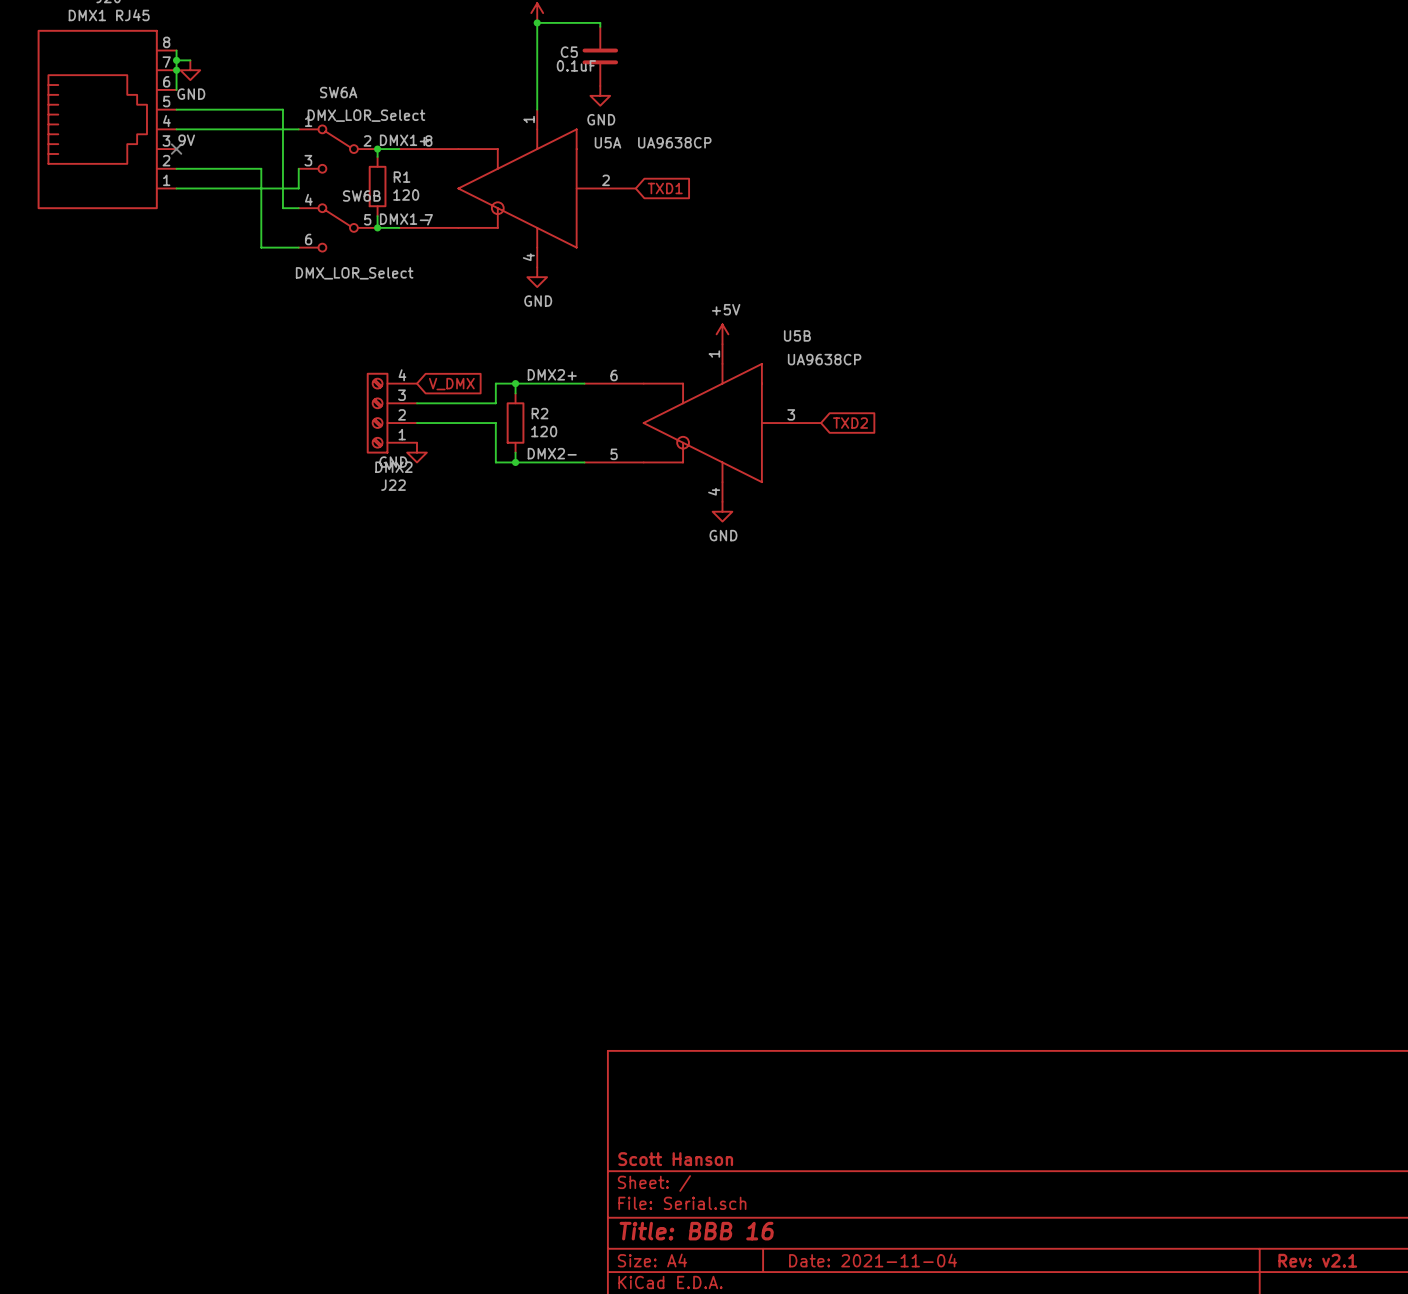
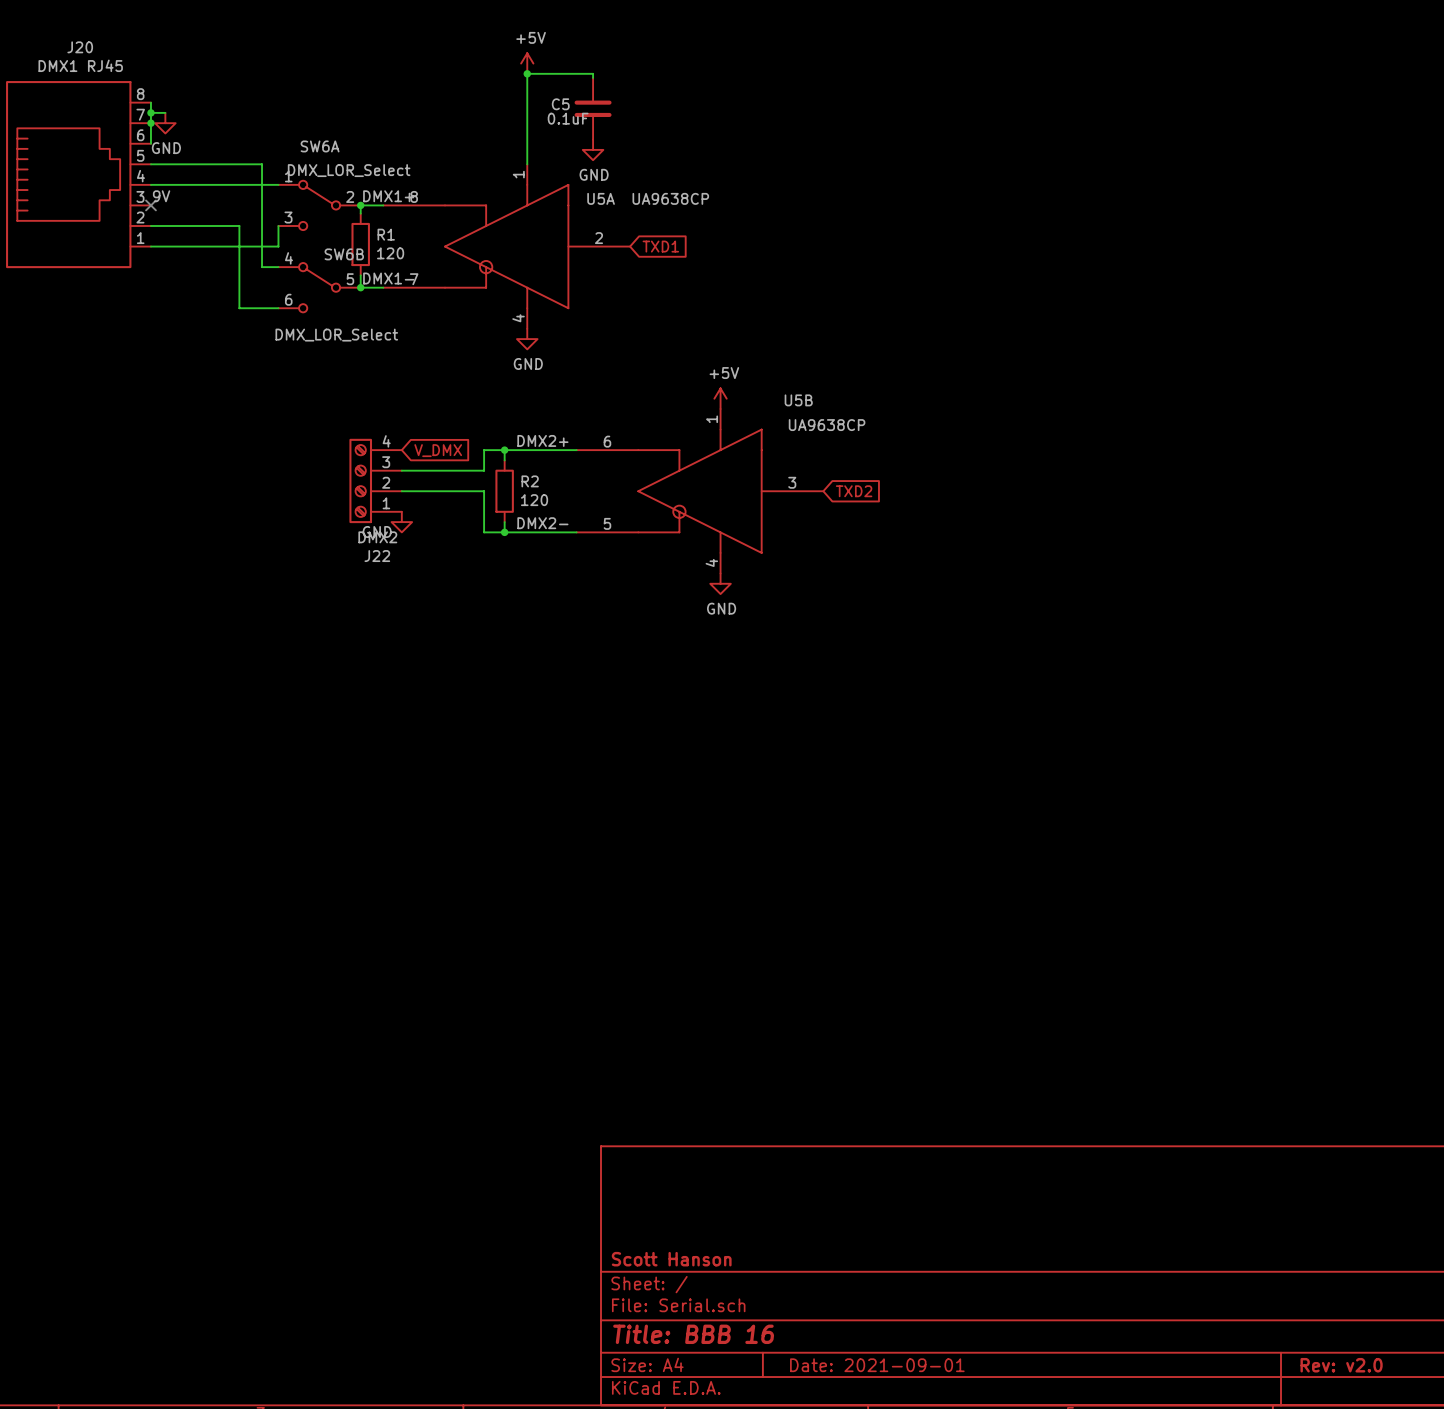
title block: Date: 2021-11-04 (873, 1260) -> Date: 2021-09-01 (877, 1365)
title block: Rev: v2.1 (1317, 1260) -> Rev: v2.0 (1341, 1365)

